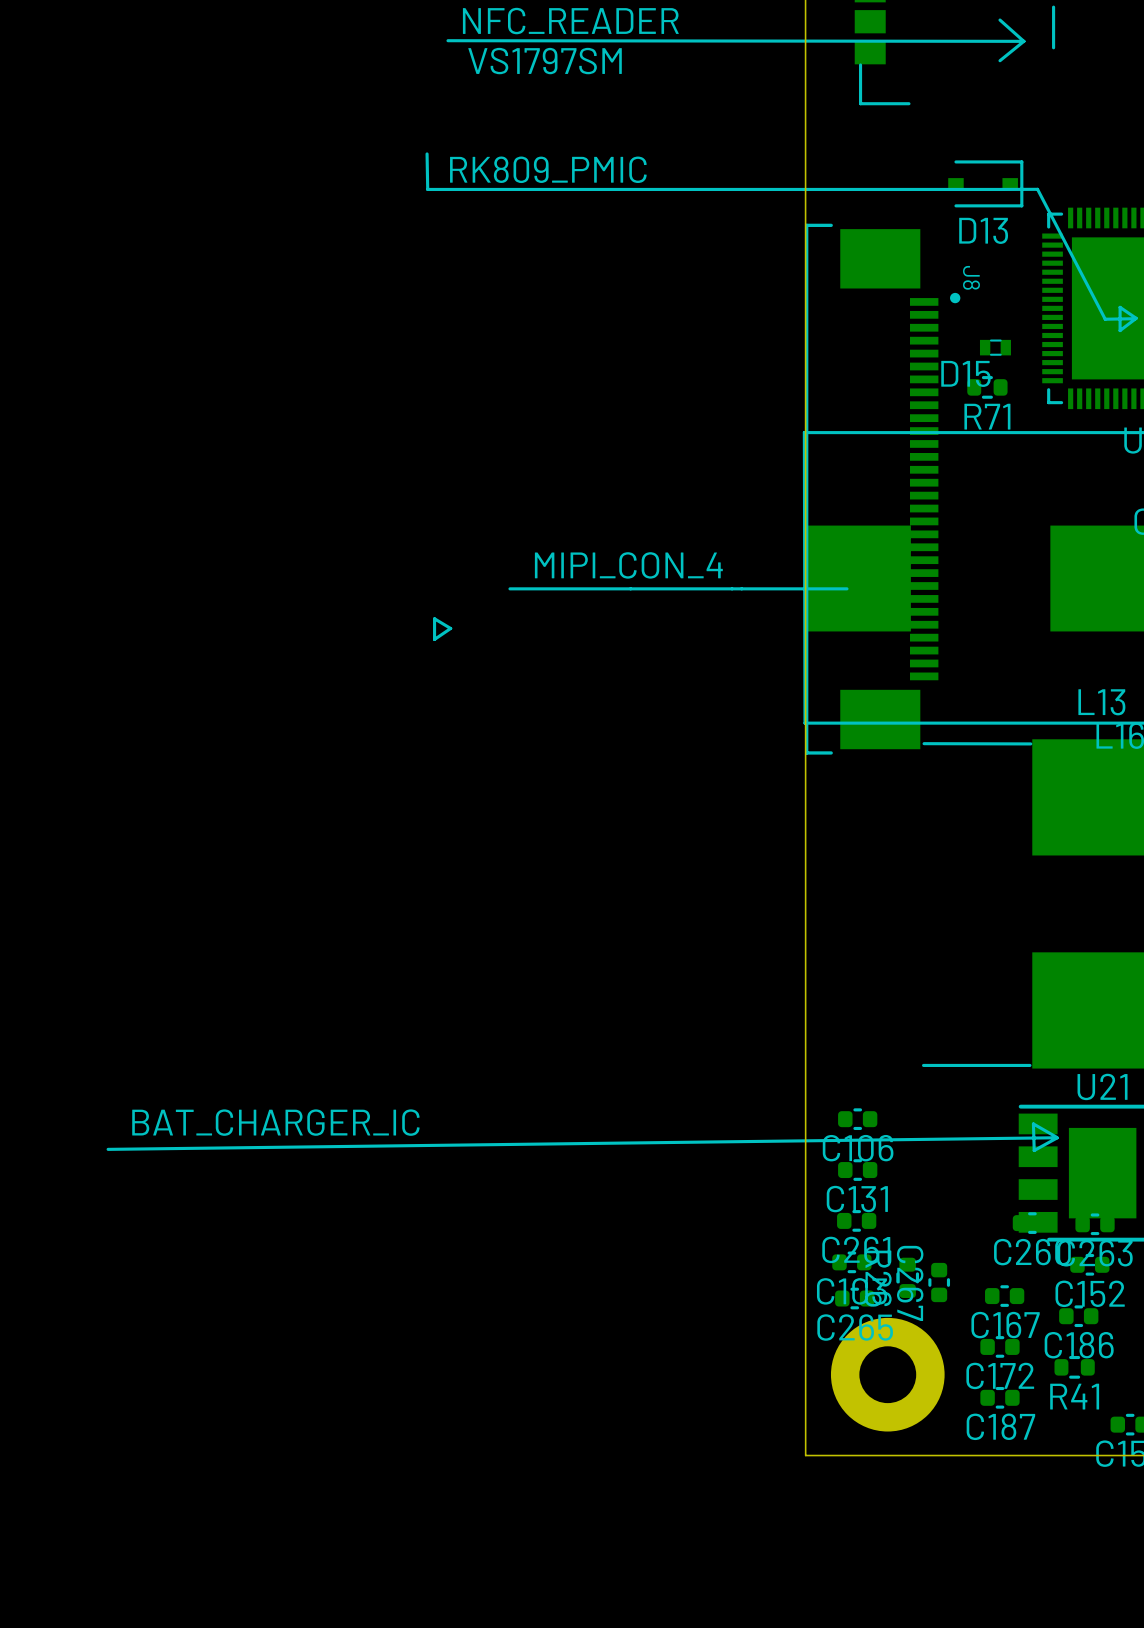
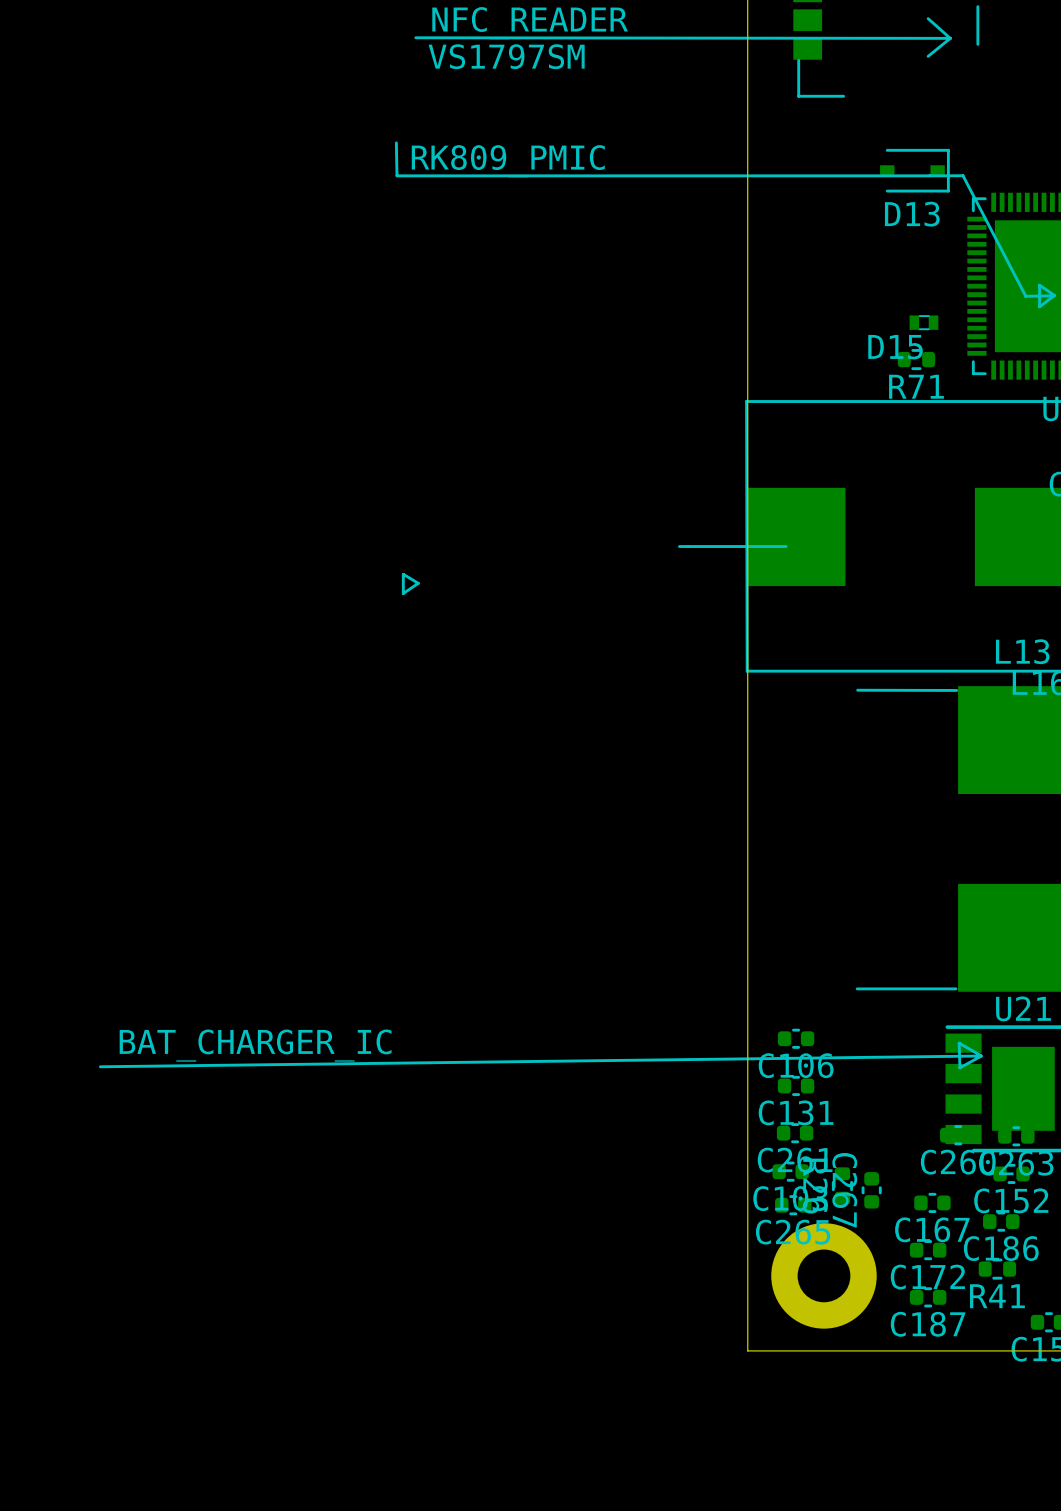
J8: (882, 489) -> none
text: MIPI_CON_4 (628, 565) -> none
line: (732, 588) (509, 588) -> none

